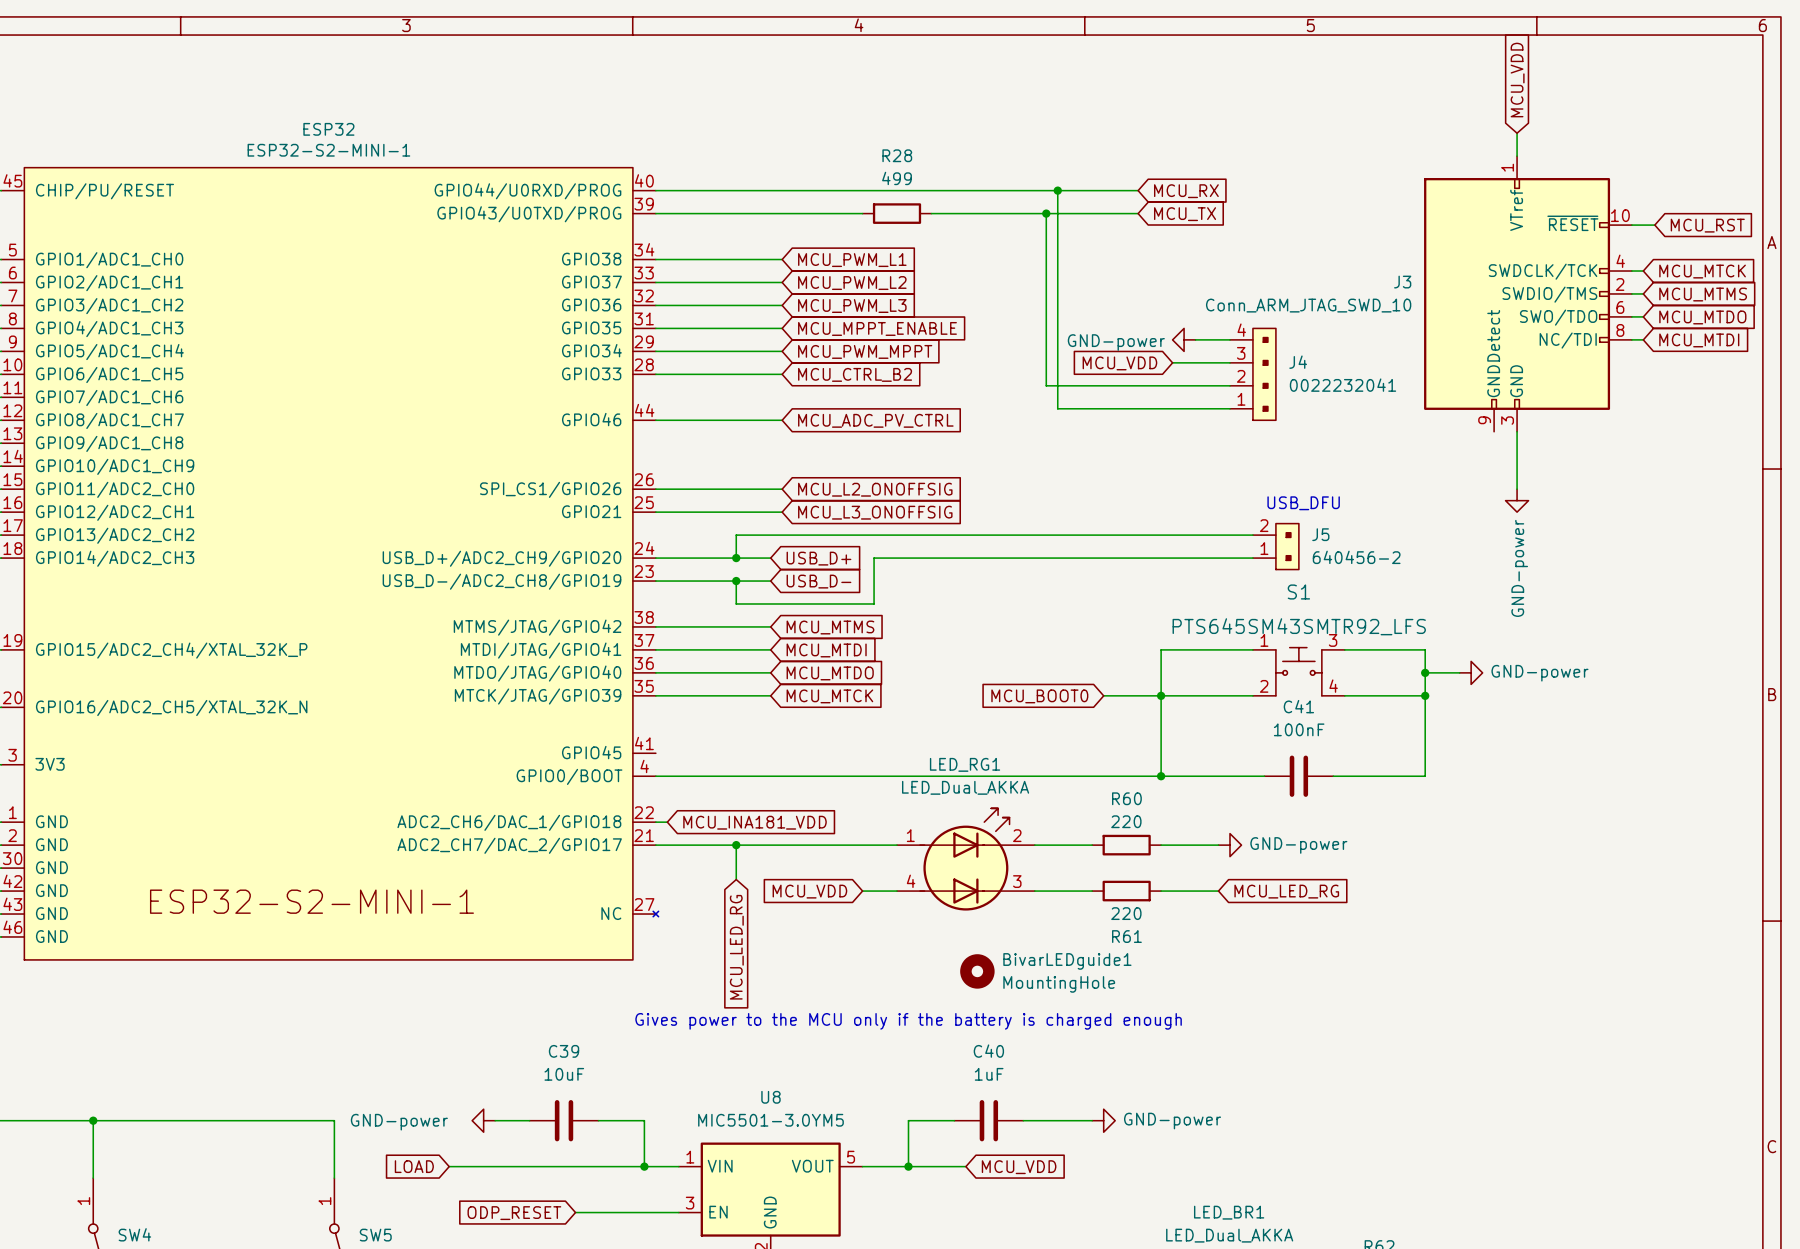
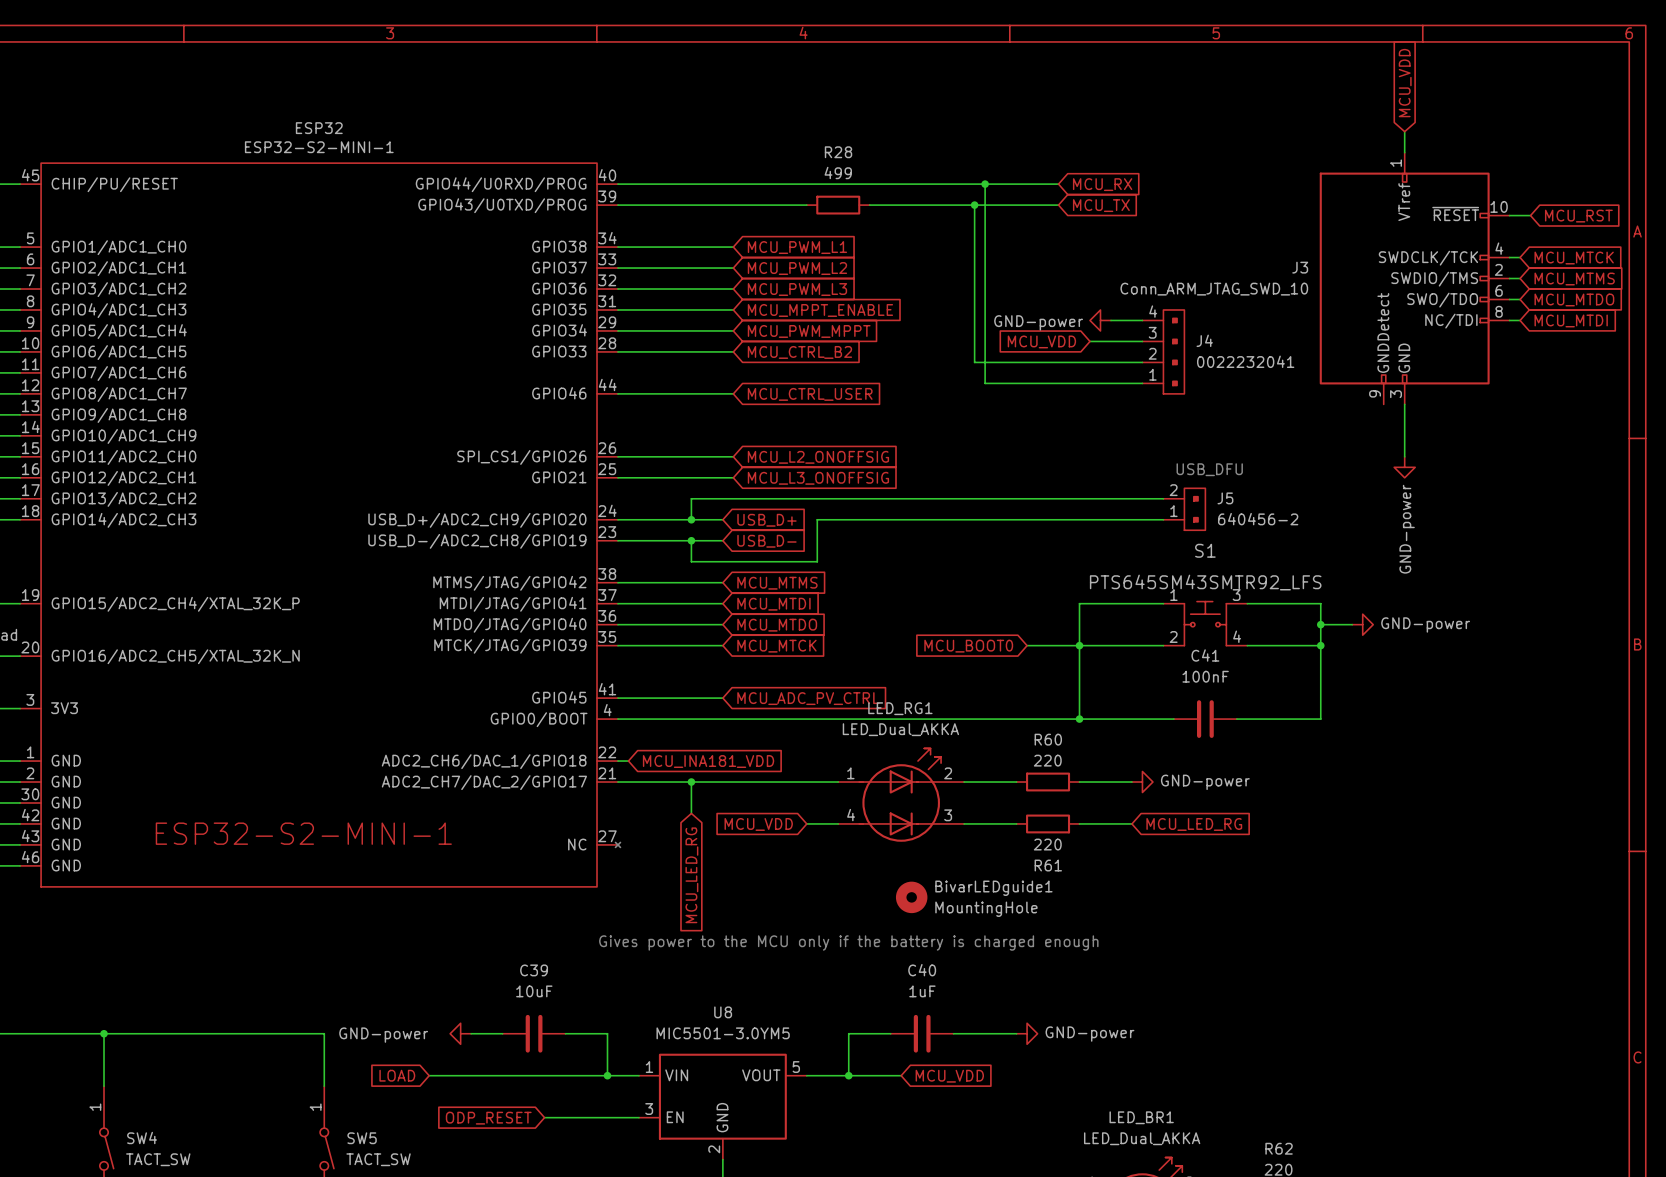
global label: MCU_ADC_PV_CTRL (875, 420) -> MCU_CTRL_USER (810, 394)
wire: none -> (617, 698) (722, 698)
global label: none -> MCU_ADC_PV_CTRL (808, 698)

